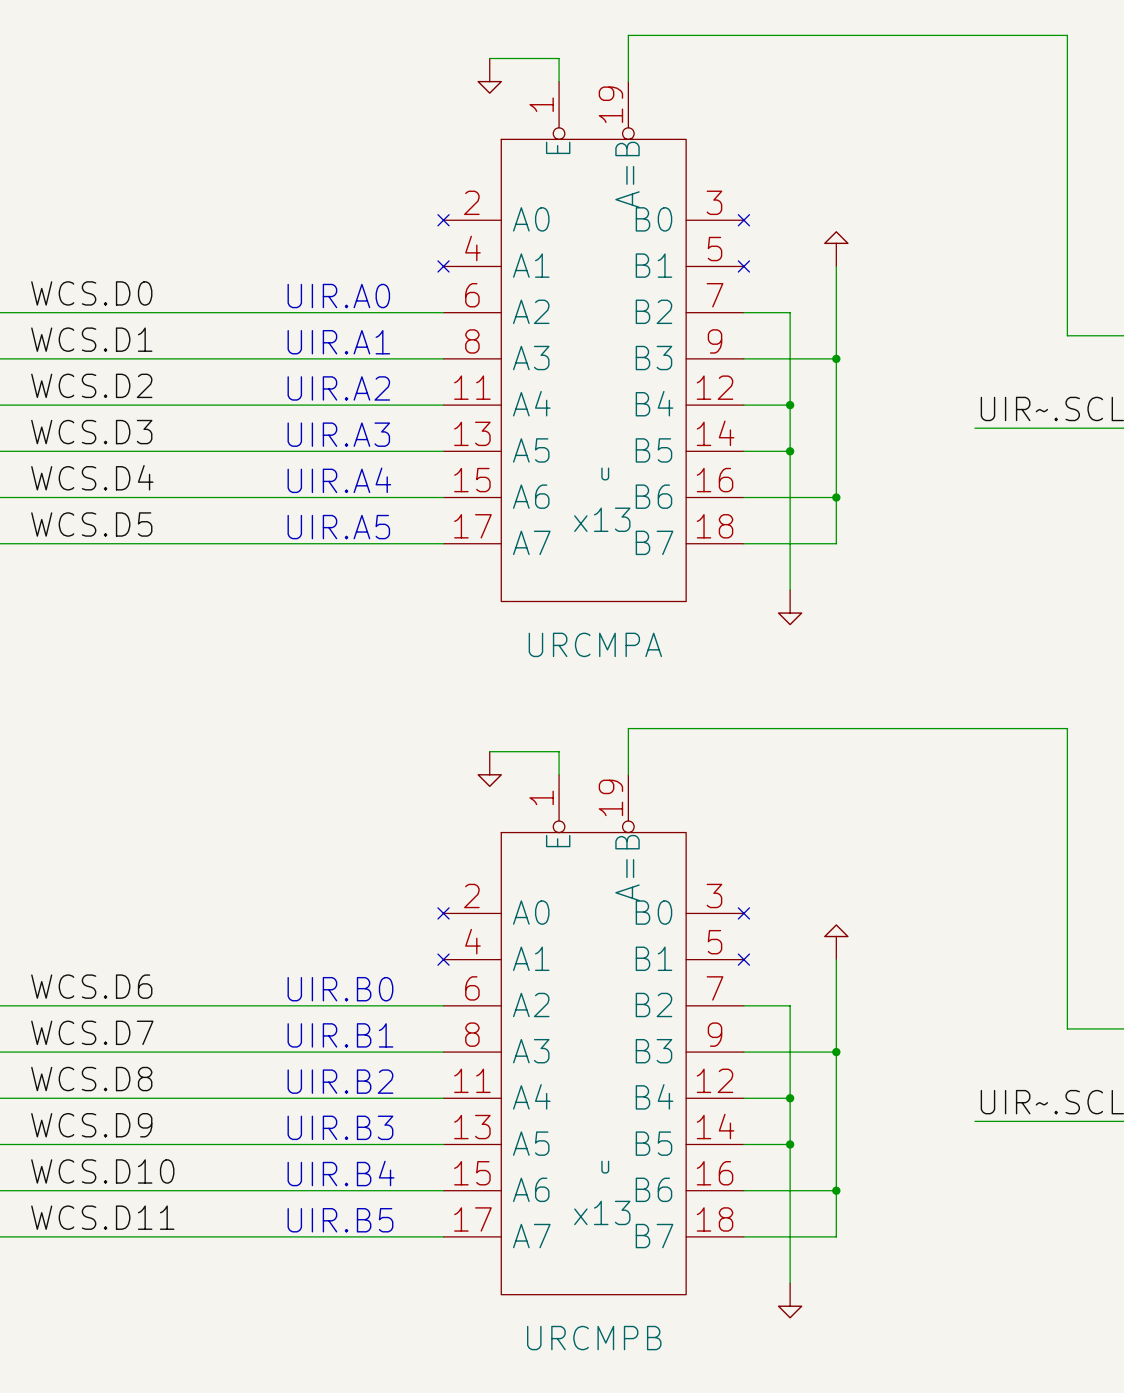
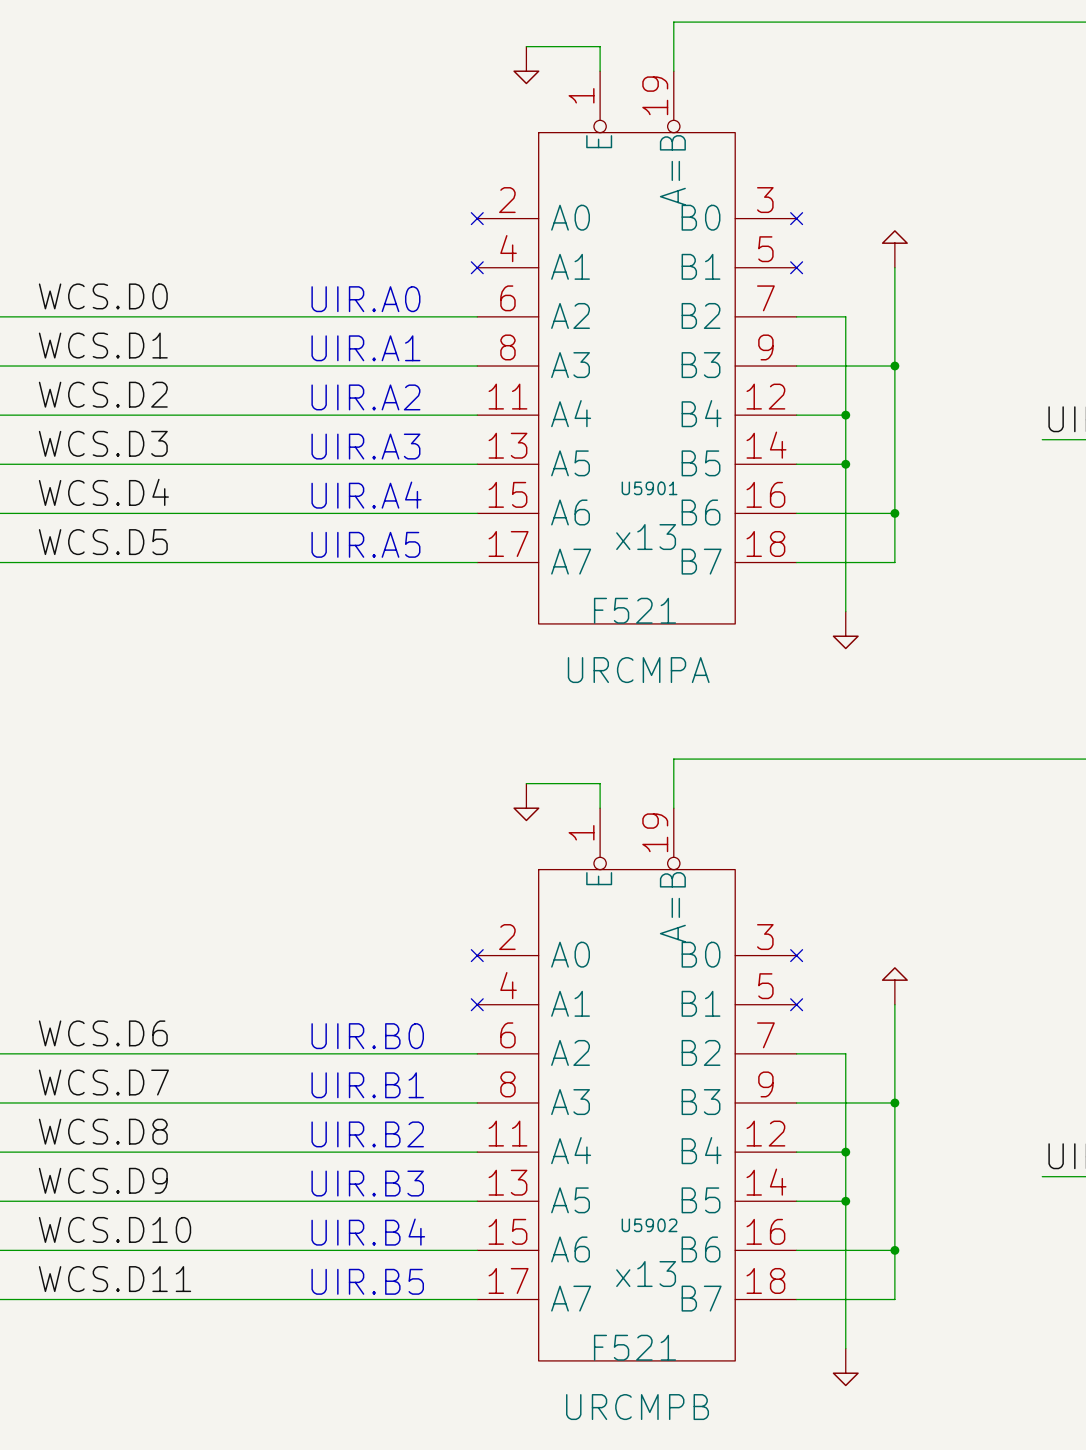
U name: U (605, 473) -> U5901 (649, 488)
U value: none -> F521 (634, 610)
U name: U (605, 1167) -> U5902 (649, 1225)
U value: none -> F521 (634, 1347)

